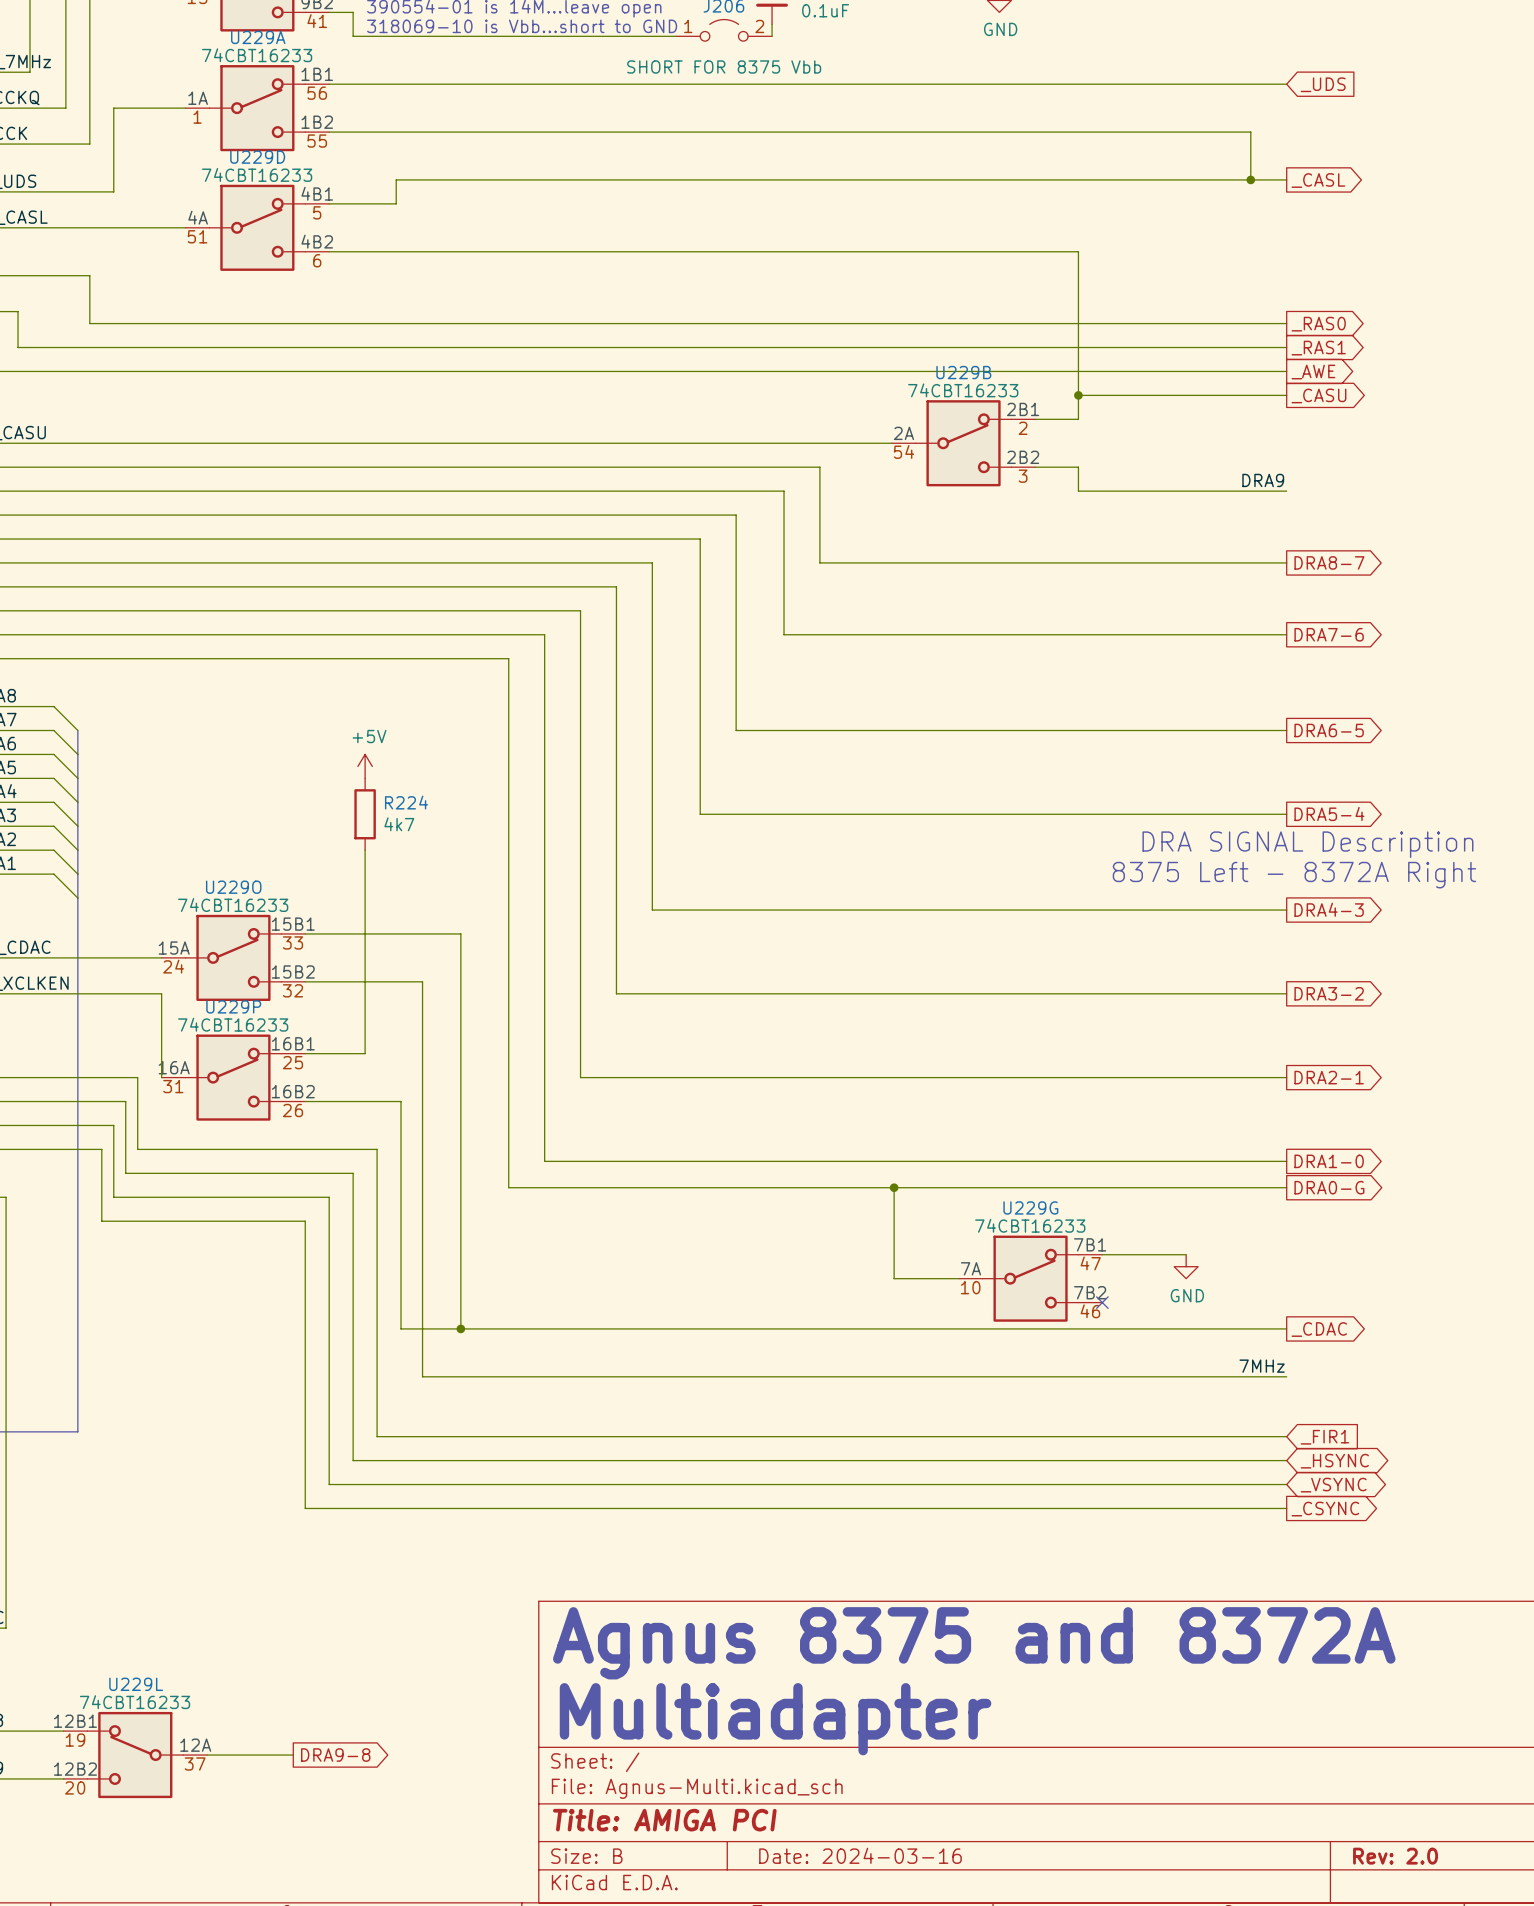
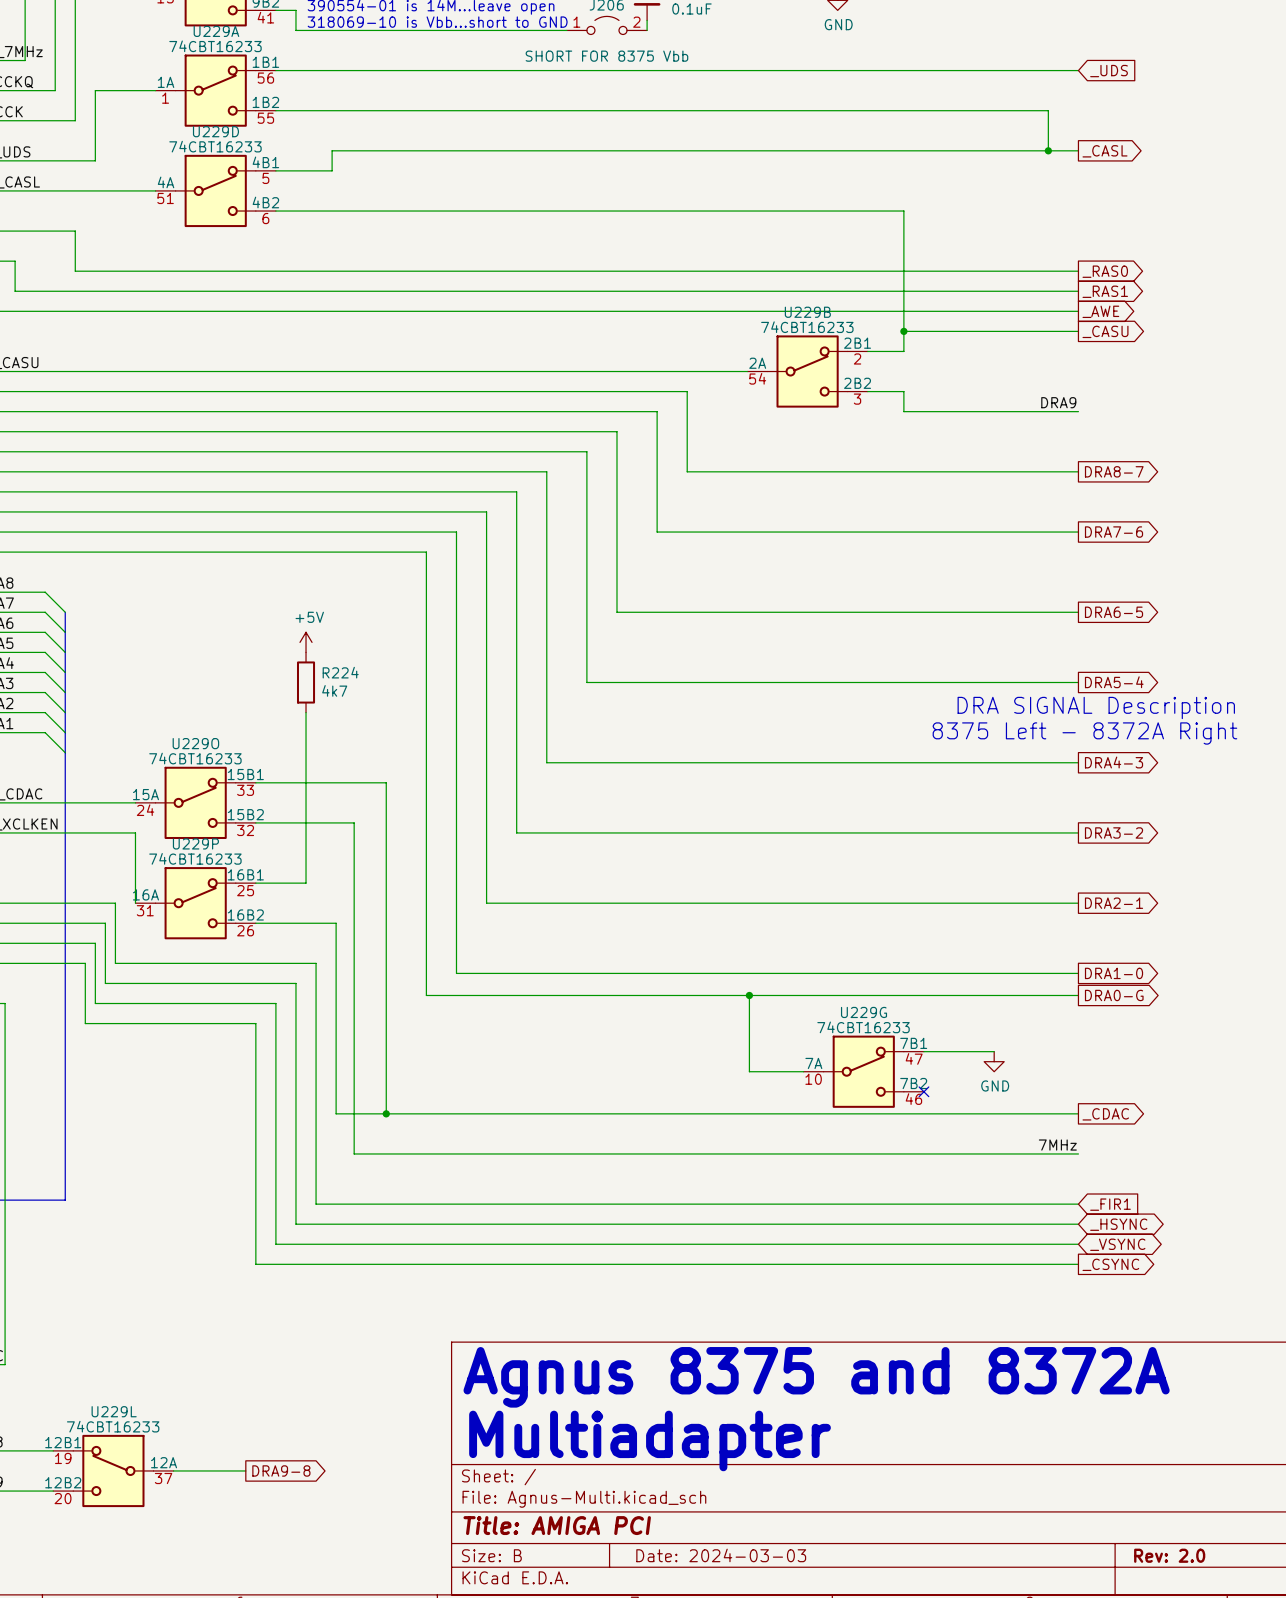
title block: Date: 2024-03-16 (860, 1855) -> Date: 2024-03-03 (721, 1555)

